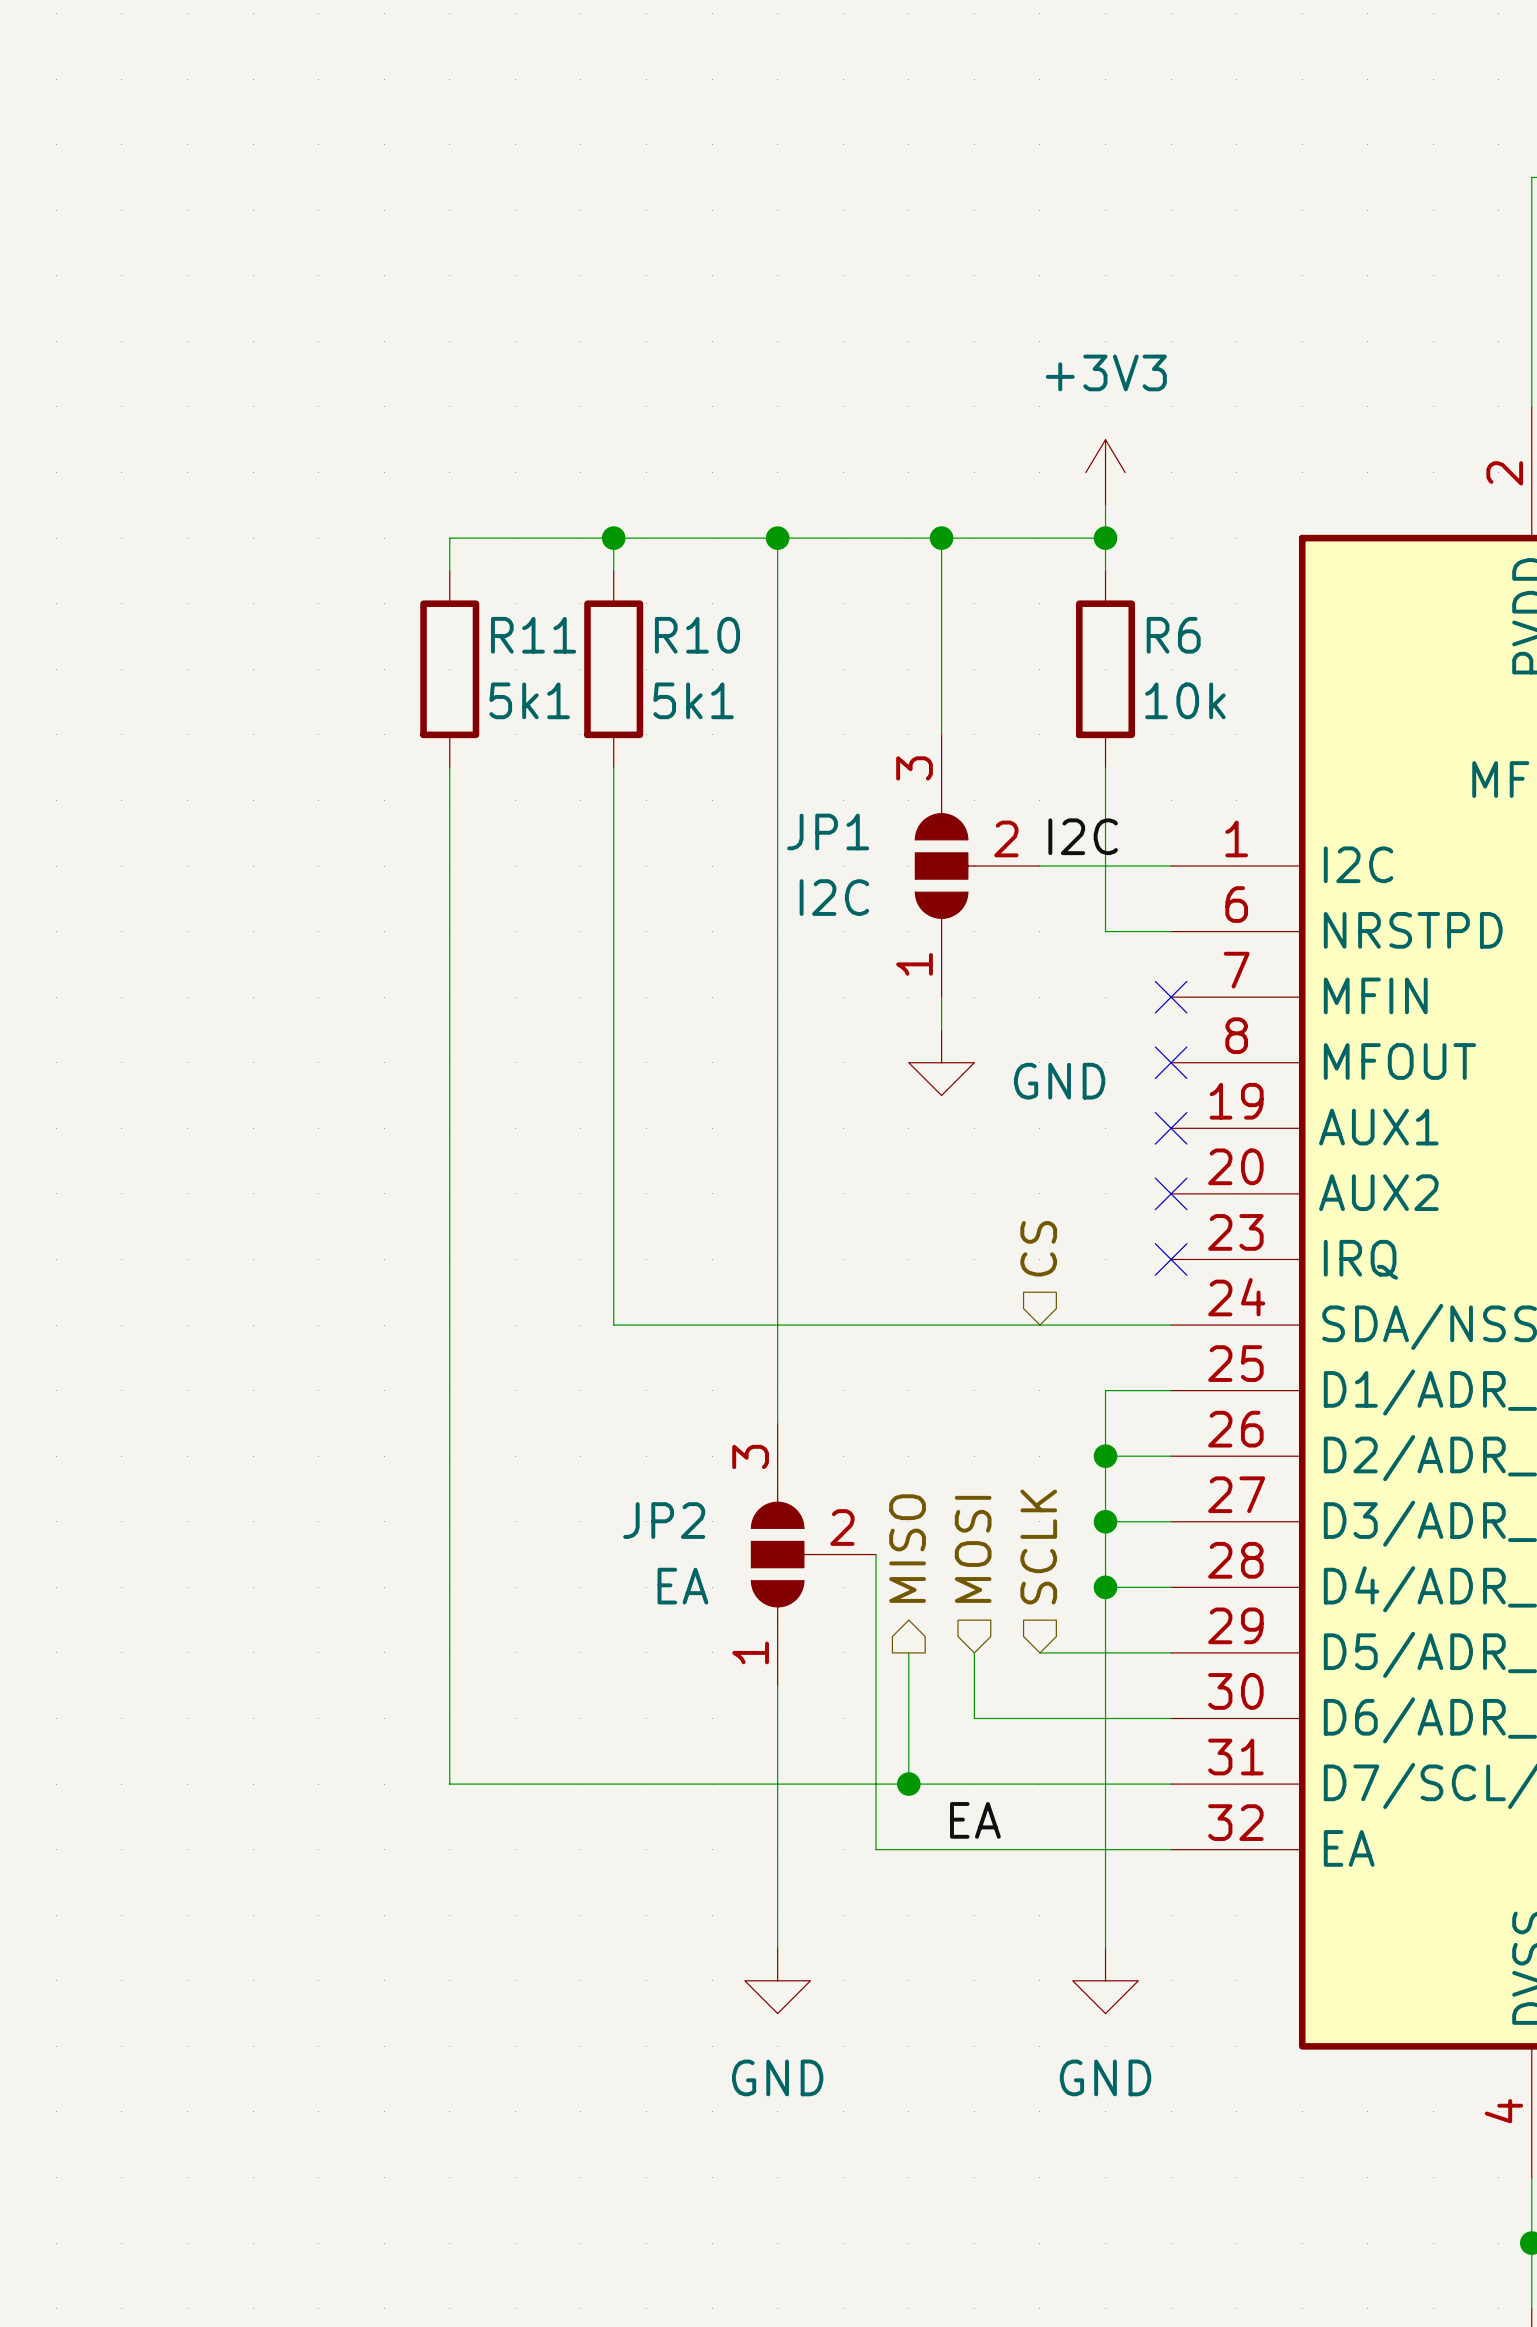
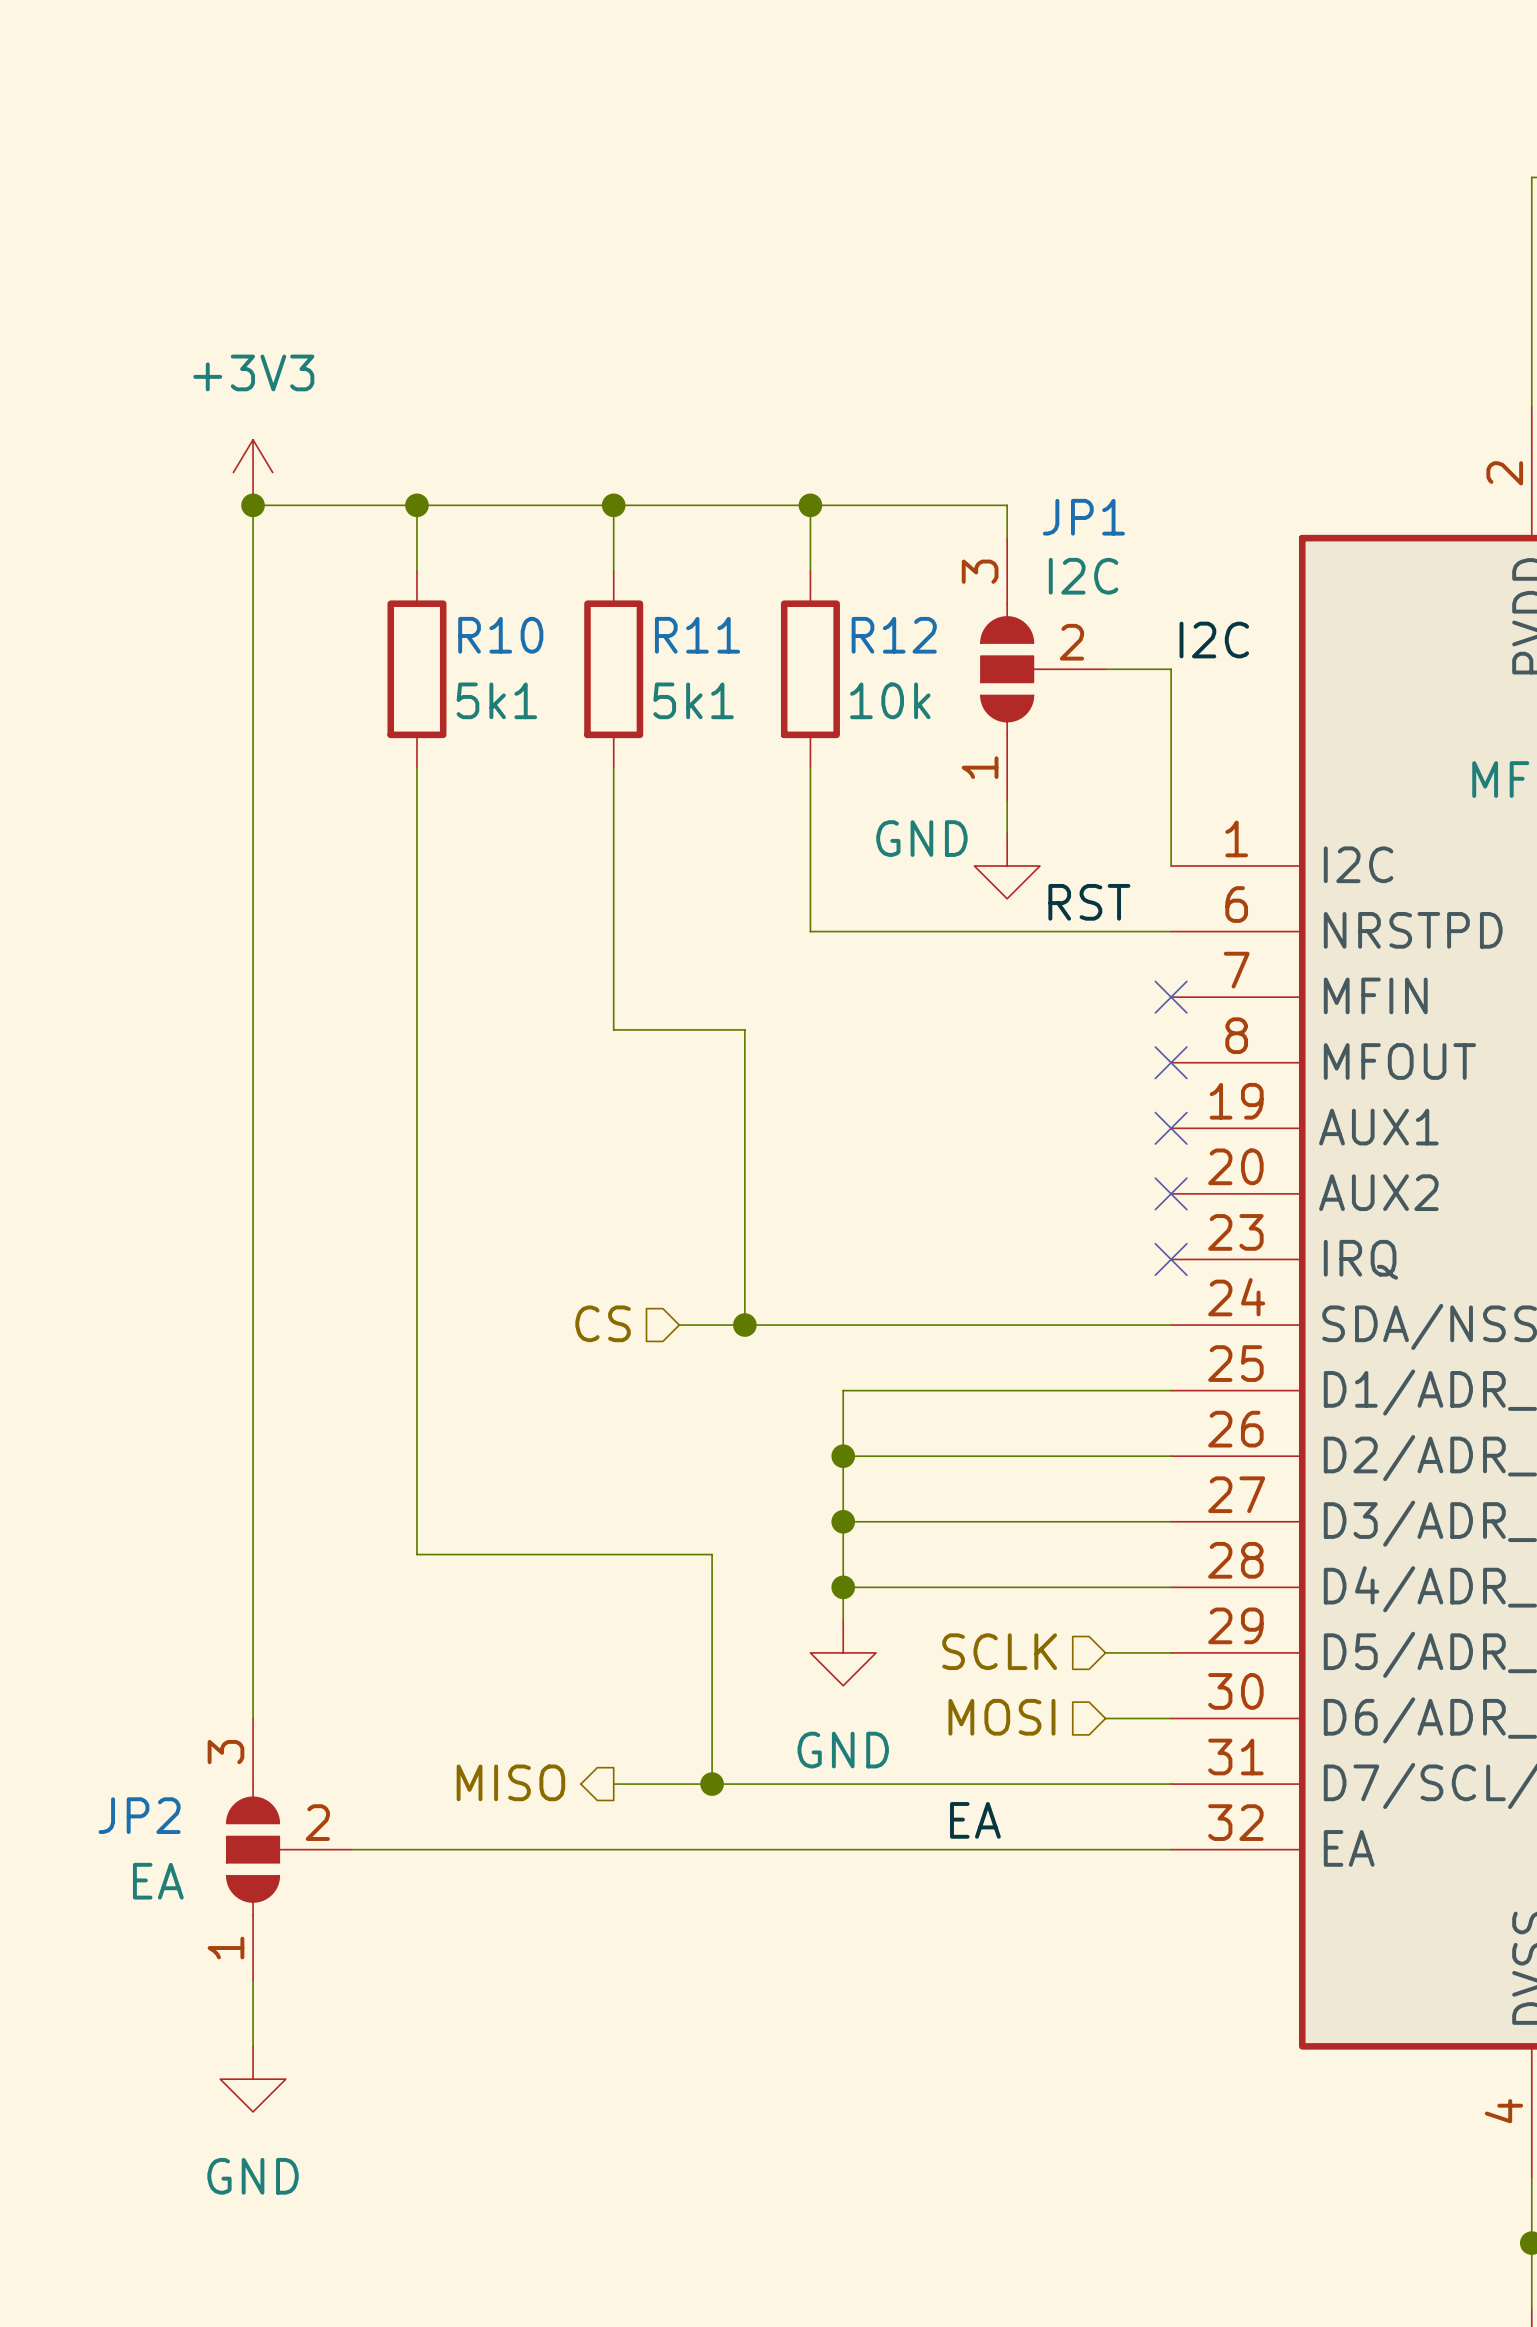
power symbol: none -> +3V3 (253, 472)
power symbol: +3V3 (1105, 472) -> none
junction: none -> (253, 505)
wire: none -> (416, 505) (416, 570)
junction: none -> (416, 505)
wire: none -> (613, 505) (613, 538)
wire: (1105, 505) (1105, 570) -> (810, 505) (810, 570)
junction position: (613, 538) -> (613, 505)
wire: (777, 538) (777, 1423) -> none
junction position: (777, 538) -> (810, 505)
wire: (941, 538) (941, 734) -> none
junction: (941, 538) -> none
wire: none -> (1007, 538) (1007, 505) (253, 505) (253, 1718)
wire: (1105, 538) (449, 538) (449, 570) -> none
junction: (1105, 538) -> none
R10 name: R10 (697, 635) -> R11 (697, 635)
R10: none -> 5k1 (416, 669)
R11: 5k1 (449, 669) -> none
R12: none -> 10k (810, 669)
R6: 10k (1105, 669) -> none
wire: none -> (416, 767) (416, 1554) (712, 1554) (712, 1784)
wire: (449, 767) (449, 1784) (613, 1784) -> none
wire: (1105, 767) (1105, 931) -> (810, 767) (810, 931) (1105, 931)
JP1 name position: JP1 (828, 831) -> JP1 (1083, 517)
label position: I2C (1083, 836) -> I2C (1214, 640)
JP1 position: (977, 866) -> (1043, 669)
wire: (1039, 866) (1171, 866) -> (1105, 669) (1171, 669) (1171, 866)
JP1 value position: I2C (834, 897) -> I2C (1083, 576)
label: none -> RST (1089, 902)
wire: (941, 997) (941, 1029) -> (1007, 800) (1007, 833)
wire: (613, 1029) (613, 1325) (679, 1325) -> (613, 1029) (744, 1029) (744, 1325)
power symbol position: GND (941, 1062) -> GND (1007, 866)
power symbol text position: GND (1059, 1081) -> GND (921, 838)
hierarchical label rotation: 0° (1038, 1248) -> 90° counterclockwise (603, 1323)
hierarchical label position: CS (1038, 1248) -> CS (603, 1323)
junction: none -> (744, 1325)
wire: (1105, 1390) (1105, 1948) -> (1105, 1390) (843, 1390) (843, 1620)
wire: none -> (843, 1456) (1105, 1456)
junction: none -> (843, 1456)
junction: (1105, 1456) -> none
wire: none -> (843, 1521) (1105, 1521)
junction: none -> (843, 1521)
junction: (1105, 1521) -> none
hierarchical label rotation: 0° (1038, 1547) -> 90° counterclockwise (999, 1651)
hierarchical label rotation: 0° (907, 1548) -> 90° counterclockwise (510, 1782)
hierarchical label position: MISO (907, 1548) -> MISO (510, 1782)
hierarchical label rotation: 0° (973, 1549) -> 90° counterclockwise (1001, 1717)
hierarchical label position: MOSI (973, 1549) -> MOSI (1001, 1717)
JP2 position: (813, 1554) -> (289, 1849)
wire: (876, 1554) (876, 1849) -> (351, 1849) (876, 1849)
wire: none -> (843, 1587) (1105, 1587)
junction: none -> (843, 1587)
junction: (1105, 1587) -> none
power symbol: none -> GND (843, 1652)
wire: (908, 1652) (908, 1784) -> none
wire: (974, 1652) (974, 1718) (1105, 1718) -> none
wire: (1039, 1652) (1105, 1652) -> none
wire: (777, 1685) (777, 1948) -> none
junction: none -> (712, 1784)
junction: (908, 1784) -> none
wire: none -> (253, 1980) (253, 2046)
power symbol: GND (777, 1980) -> none
power symbol: GND (1105, 1980) -> none
power symbol: none -> GND (253, 2079)

